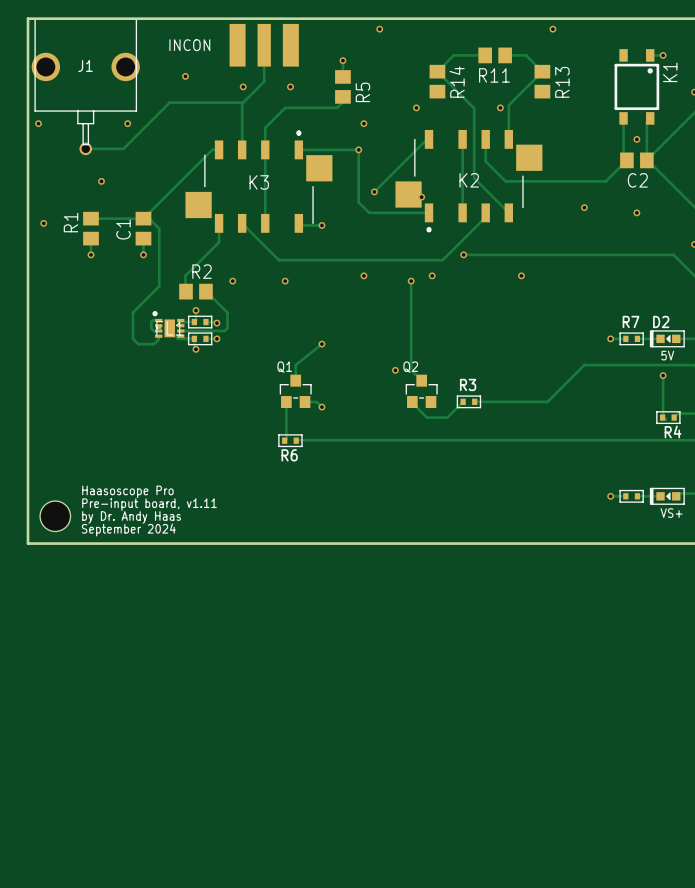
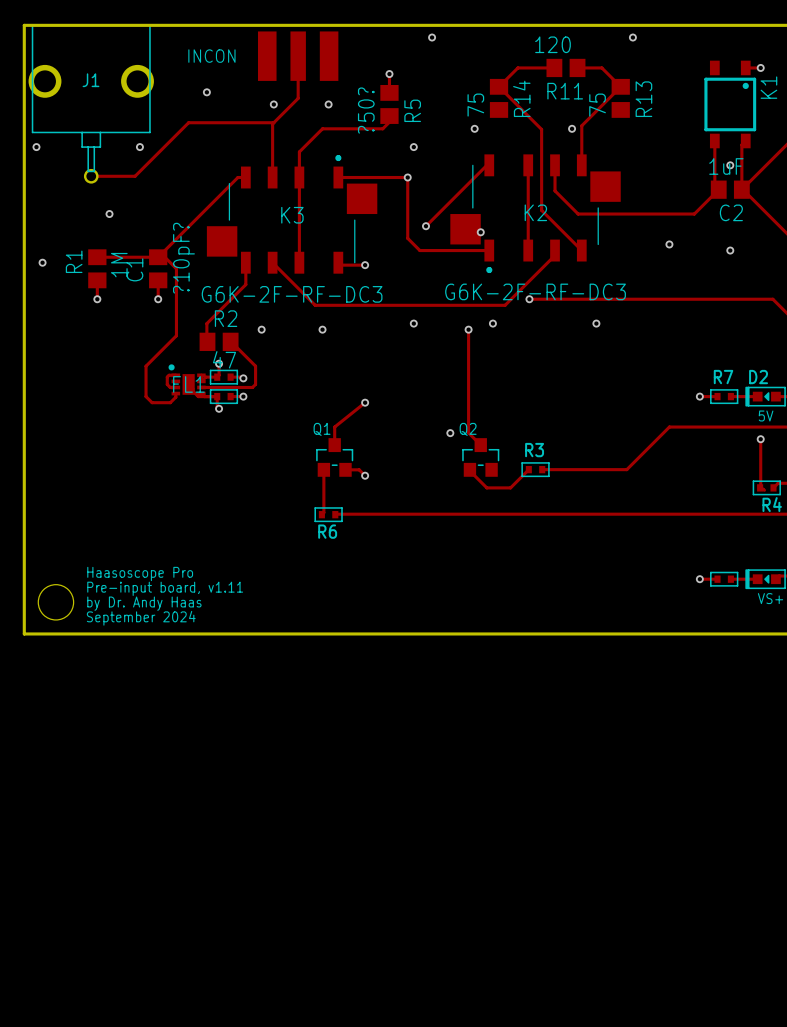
R11 value: none -> 120 (553, 44)
R14 value: none -> 75 (475, 105)
R13 value: none -> 75 (597, 105)
R5 value: none -> ?50? (366, 110)
C2 value: none -> 1uF (726, 166)
C1 value: none -> ?10pF? (183, 258)
R1 value: none -> 1M (119, 265)
K2 value: none -> G6K-2F-RF-DC3 (535, 291)
K3 value: none -> G6K-2F-RF-DC3 (292, 294)
R2 value: none -> 47 (224, 359)

